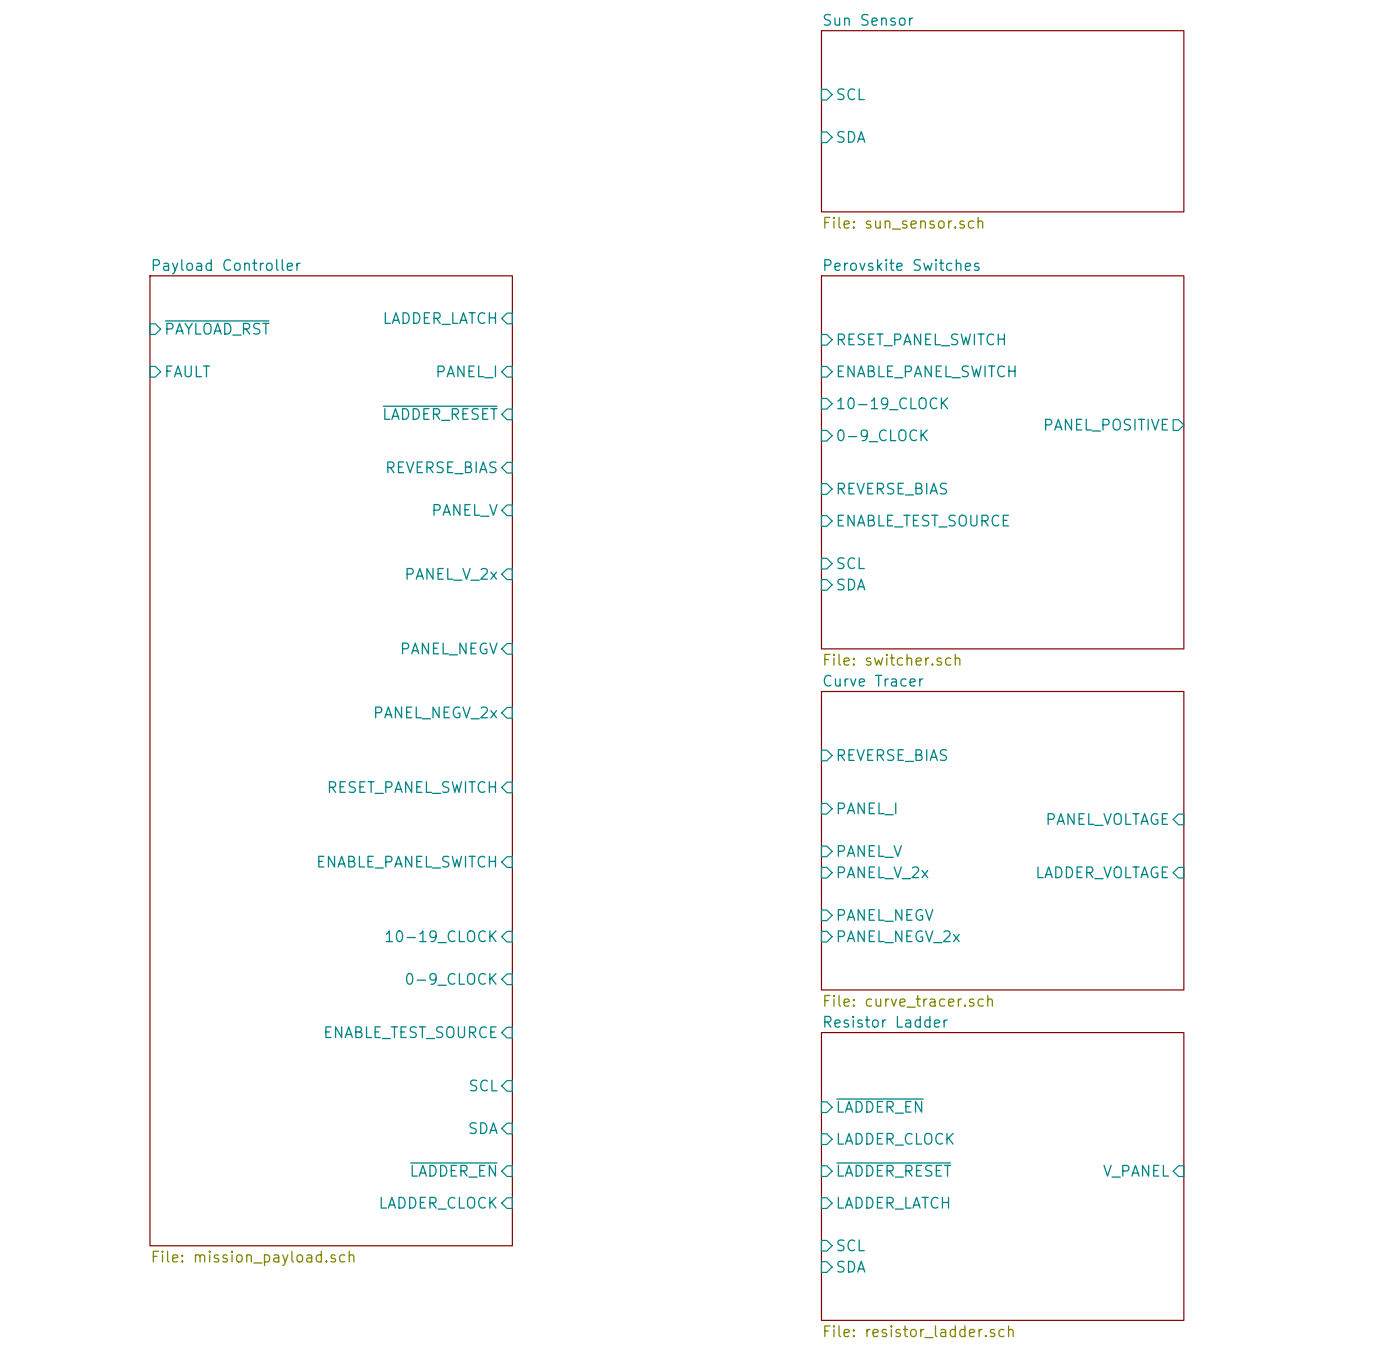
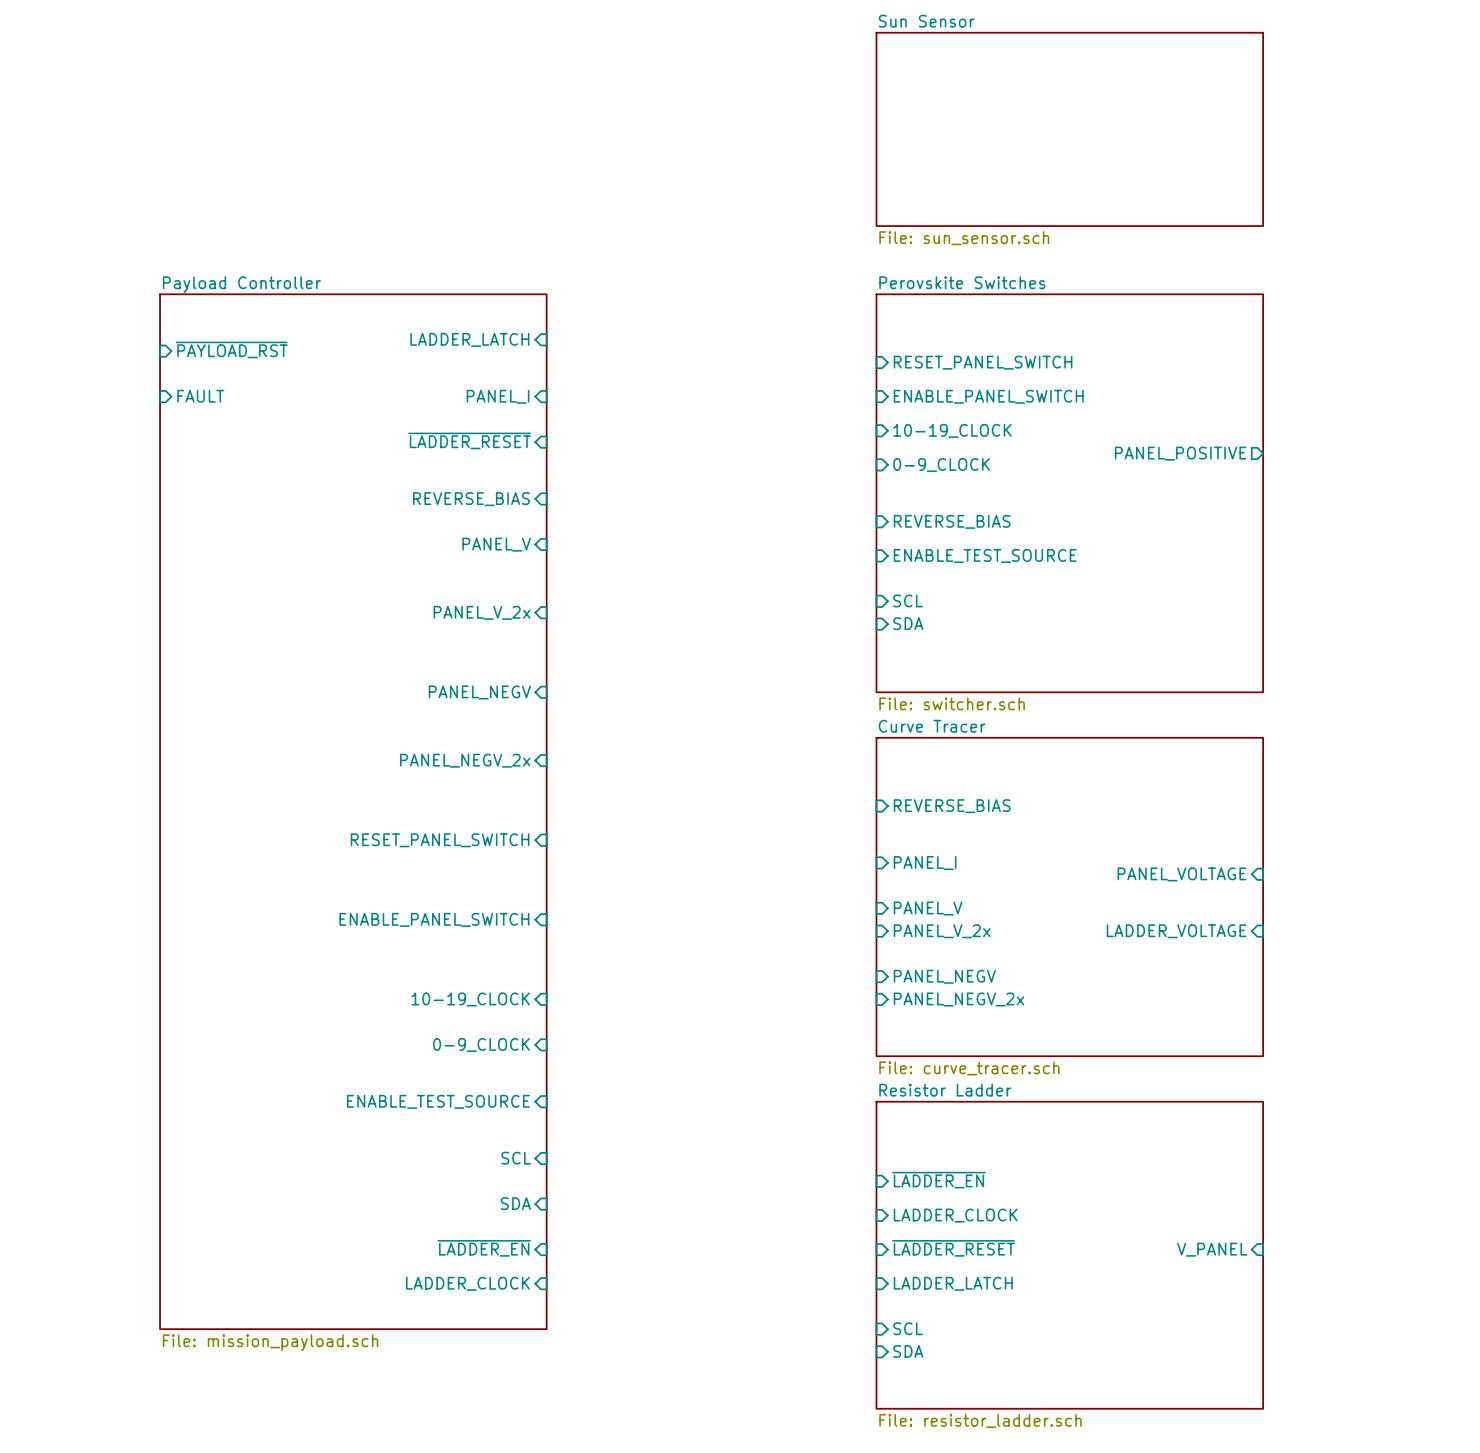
sheet pin: SCL (851, 94) -> none
sheet pin: SDA (851, 136) -> none

